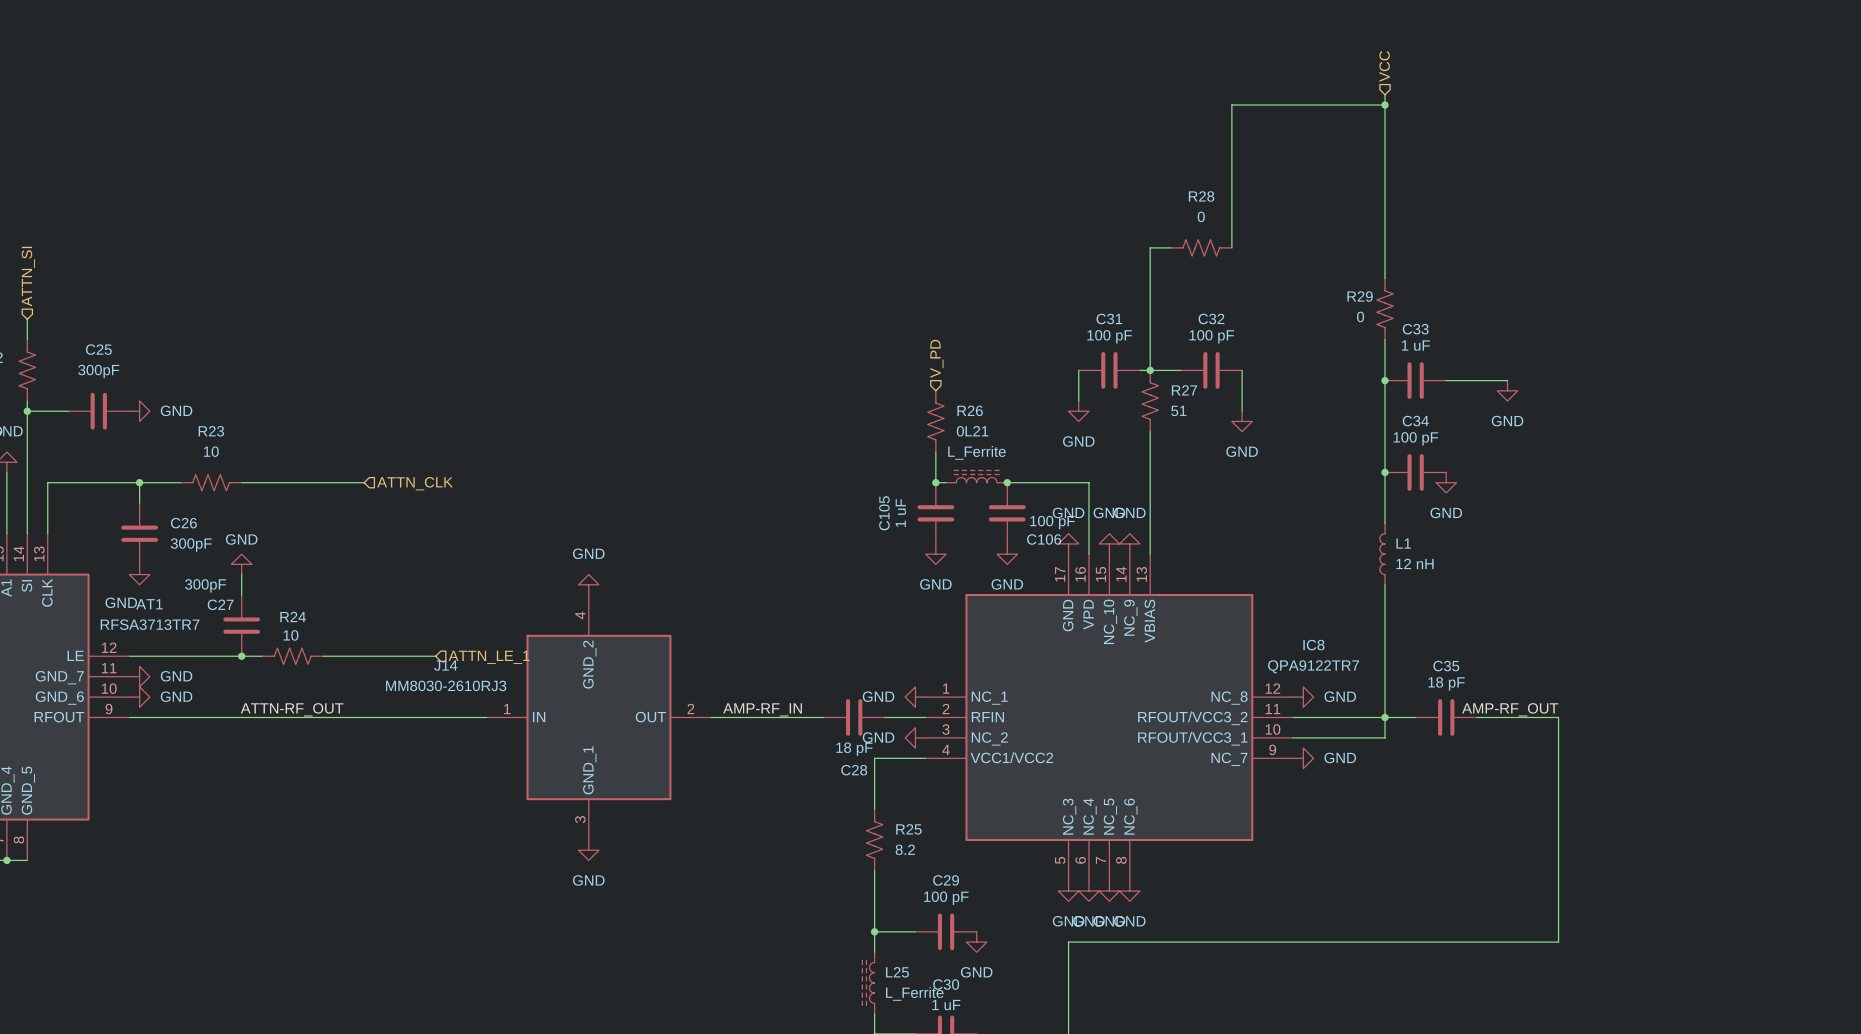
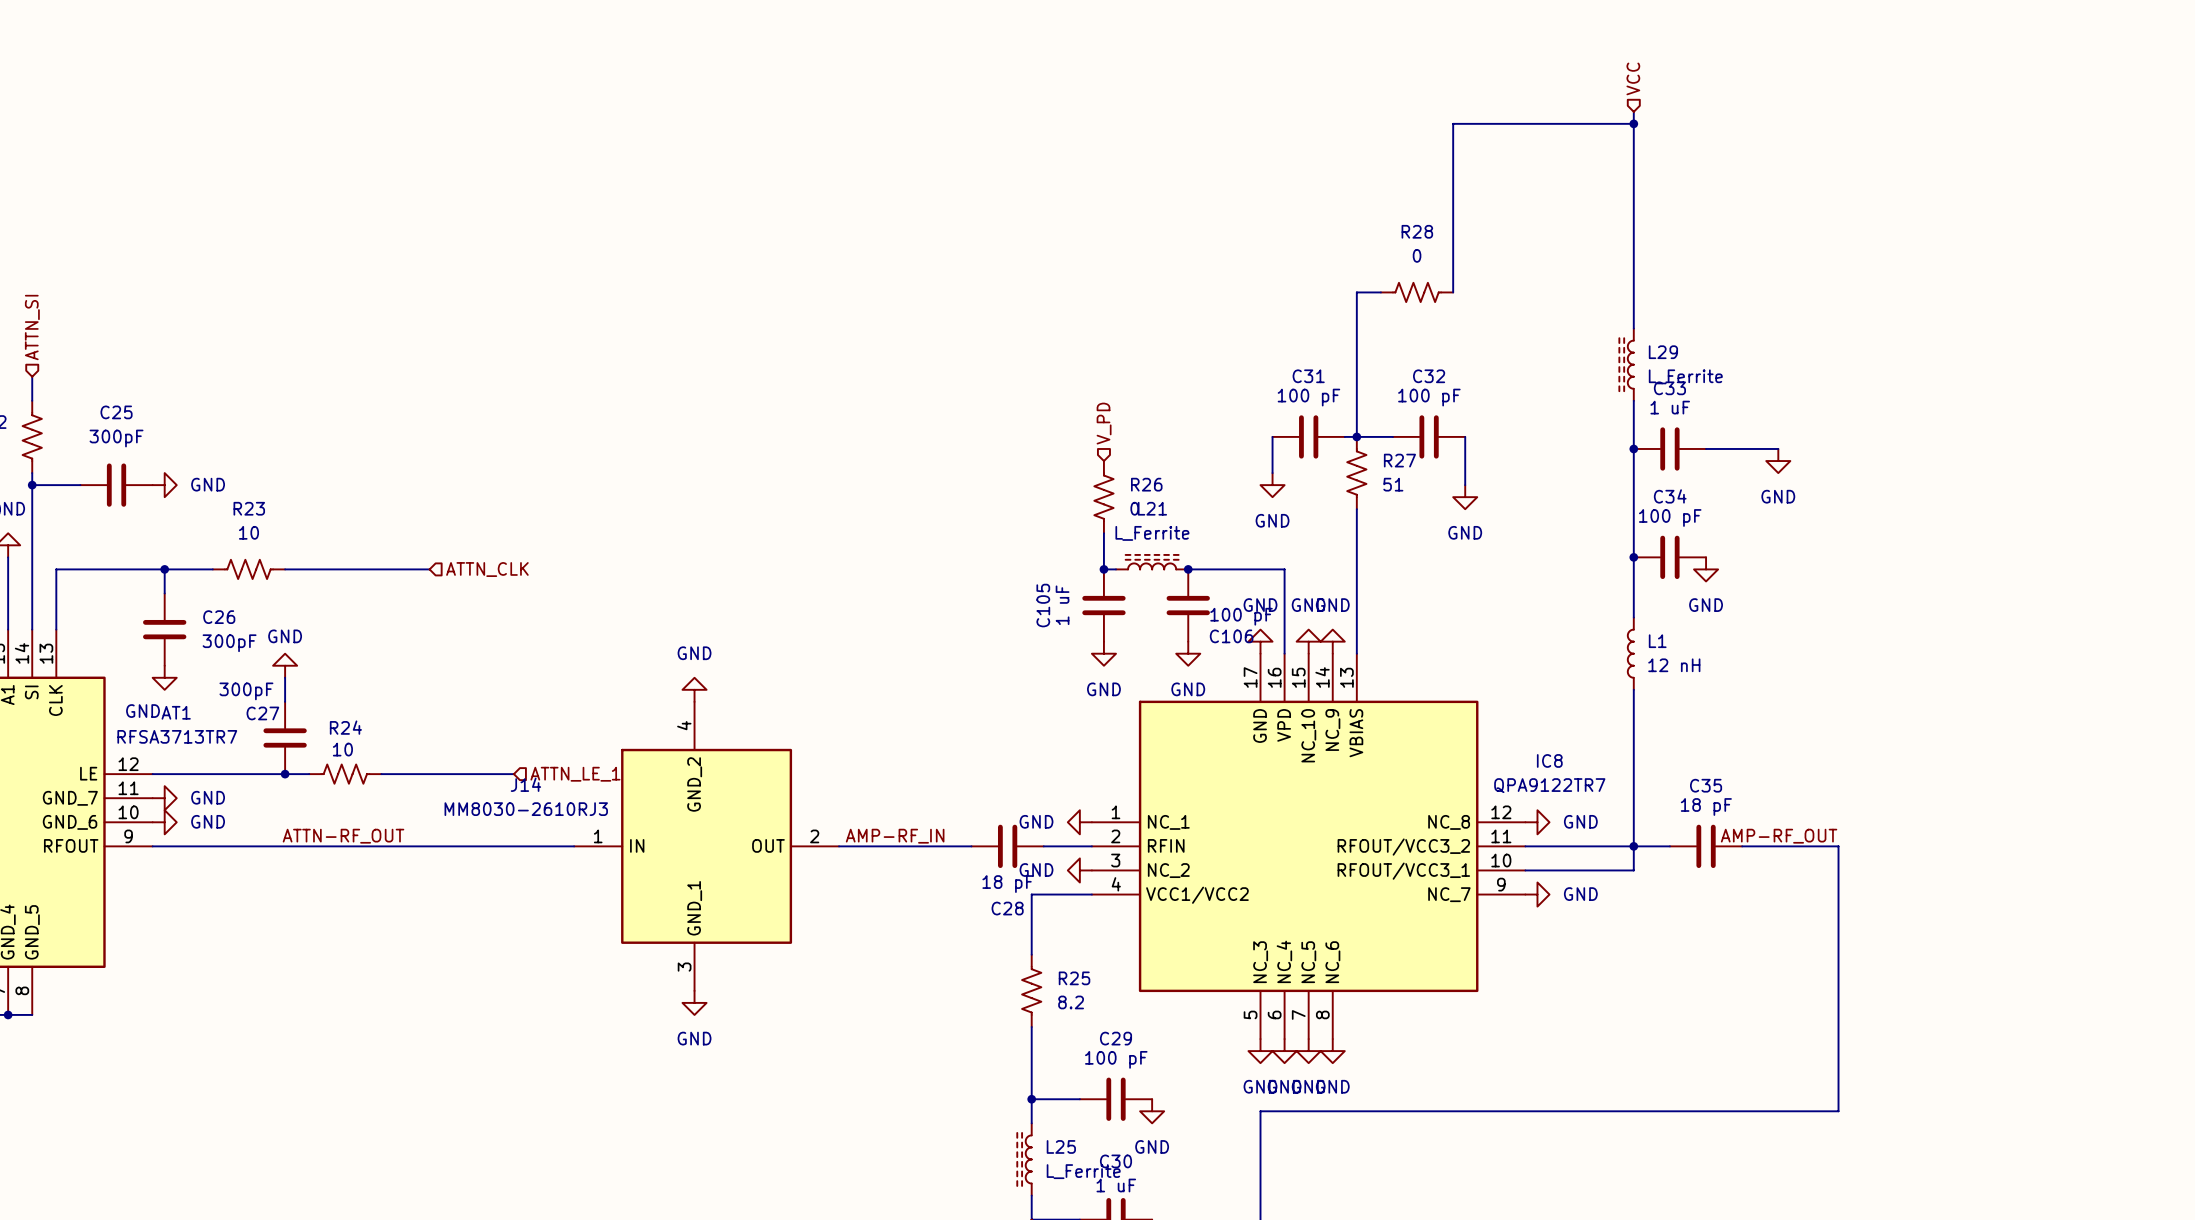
L29: none -> L_Ferrite (1626, 364)
R29: 0 (1385, 309) -> none

